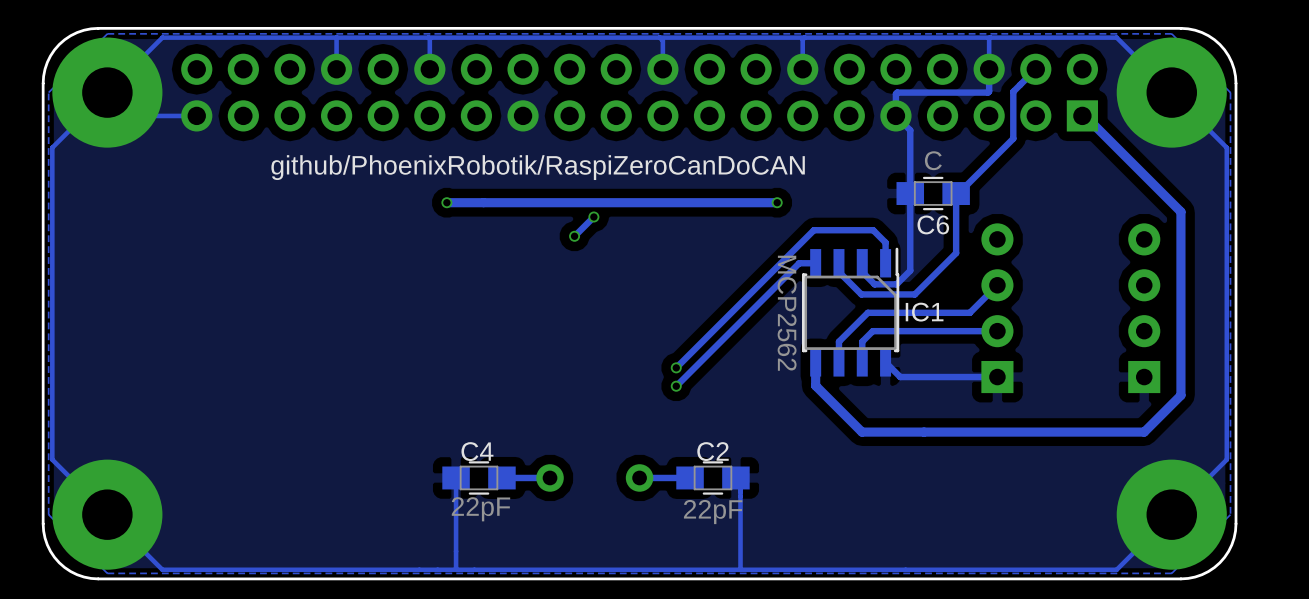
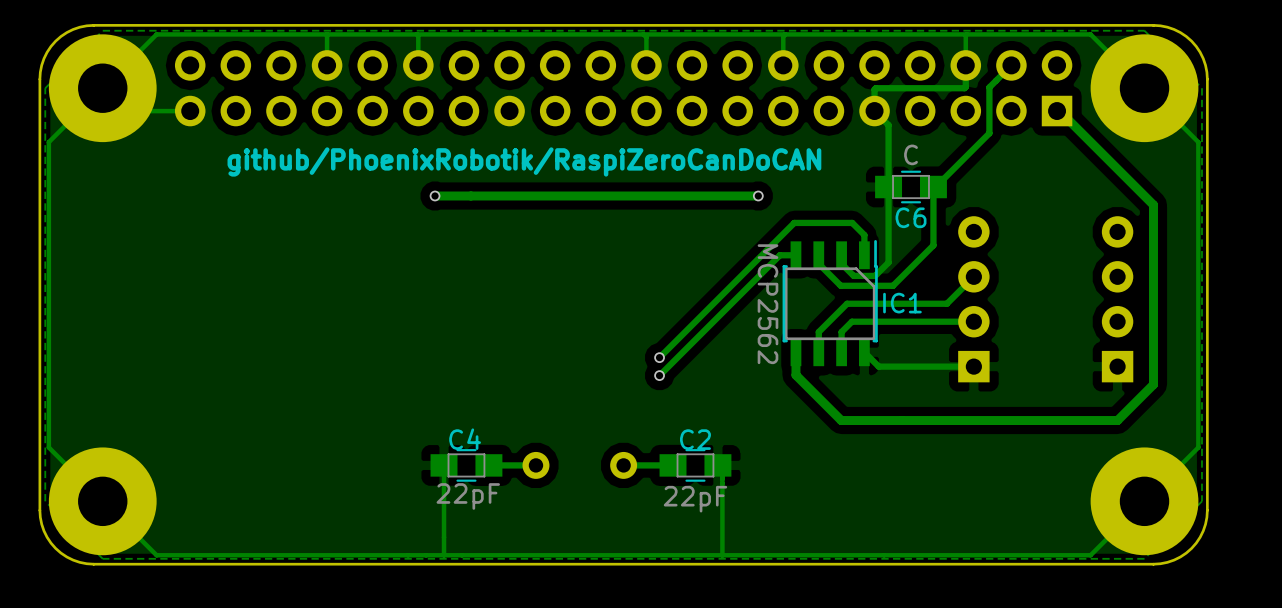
track: (593, 217) (574, 236) -> none
via: (593, 217) -> none
via: (574, 236) -> none

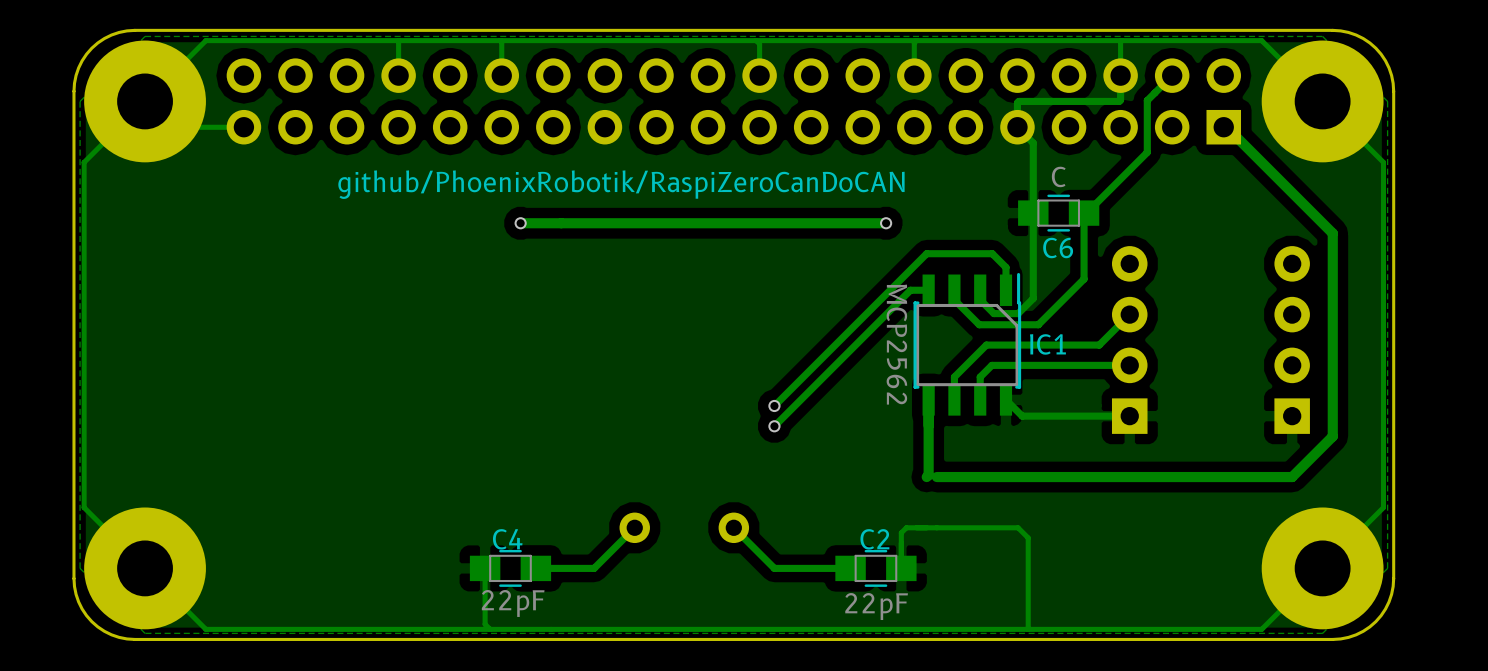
track: (795, 375) (841, 420) -> (936, 477) (979, 477)
track: none -> (928, 425) (928, 475) (926, 477)
track: (444, 465) (444, 555) -> none
C4 position: (466, 465) -> (510, 568)
track: (535, 465) (488, 465) -> (634, 527) (594, 568) (535, 568)
track: (673, 465) (623, 465) -> (850, 568) (774, 568) (733, 527)
C2 position: (695, 465) -> (875, 568)
track: (722, 465) (722, 555) -> none
track: none -> (485, 568) (485, 624) (490, 629)
track: none -> (901, 568) (901, 532) (906, 527) (1018, 527) (1028, 537) (1028, 629)

